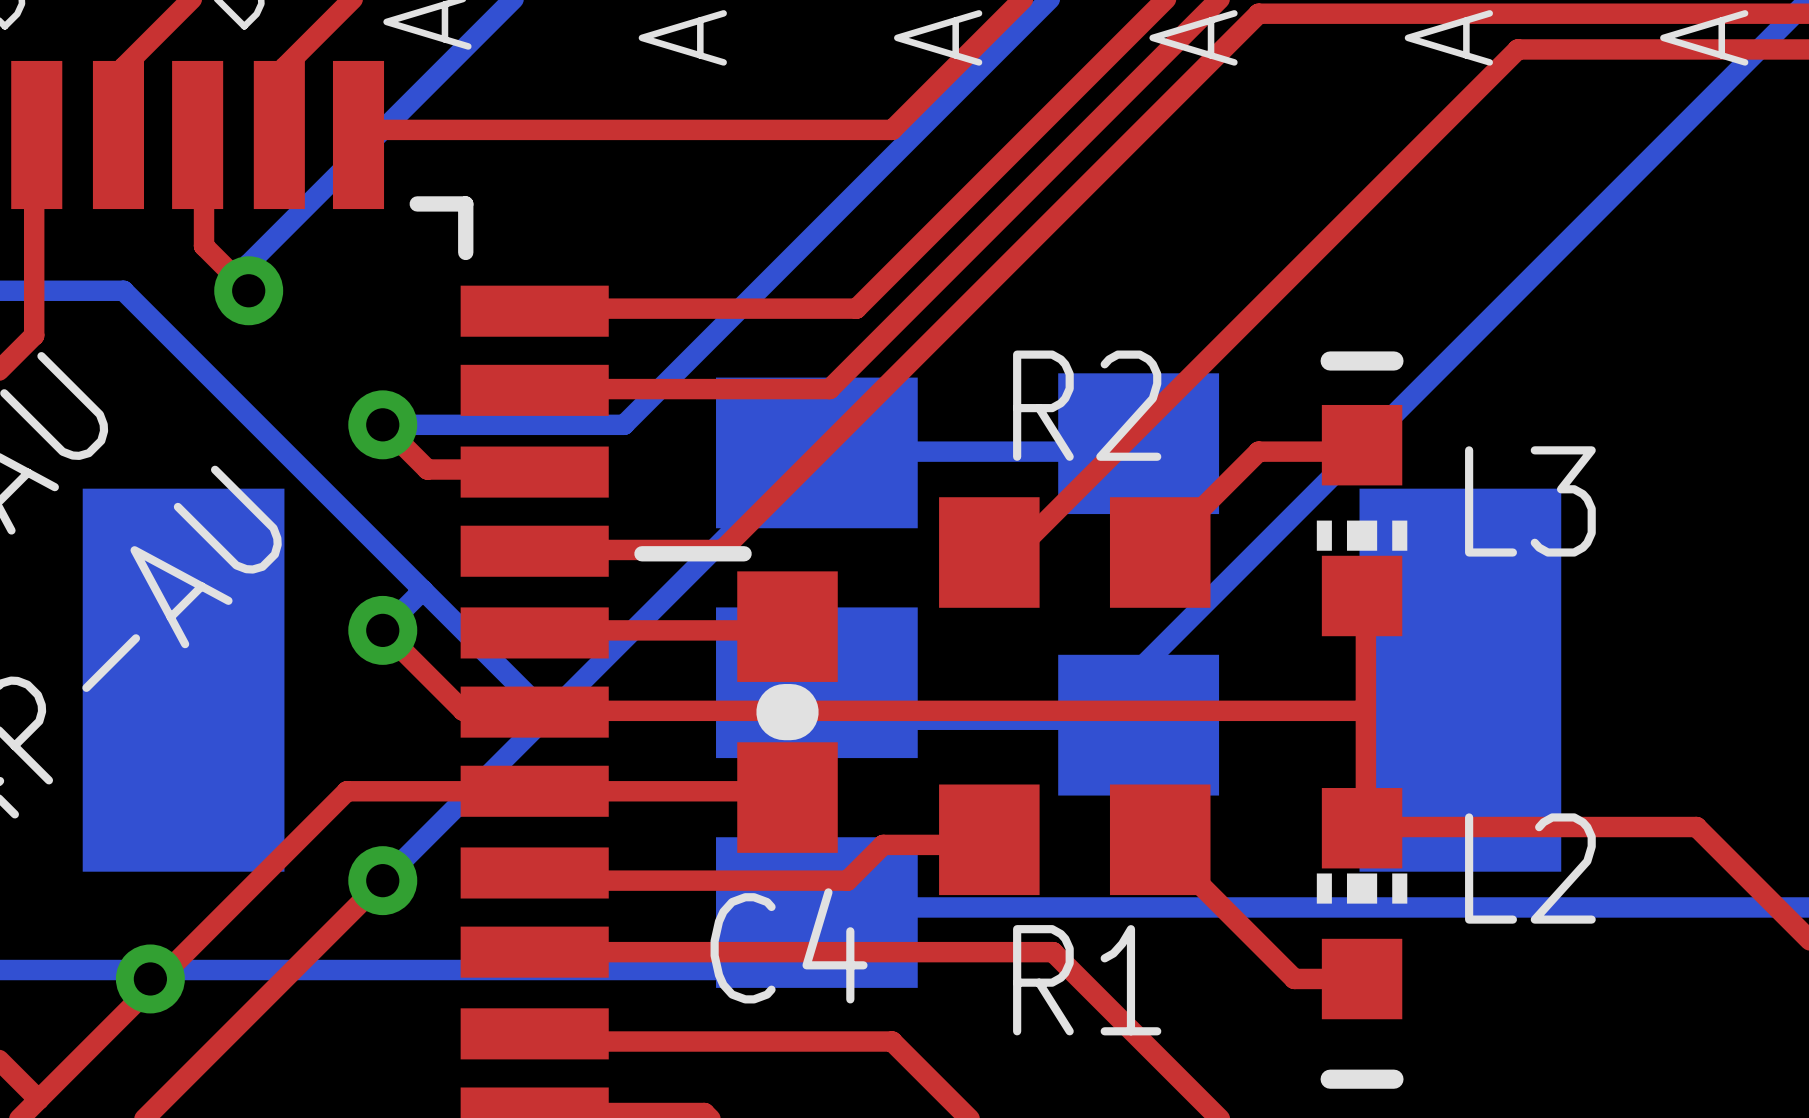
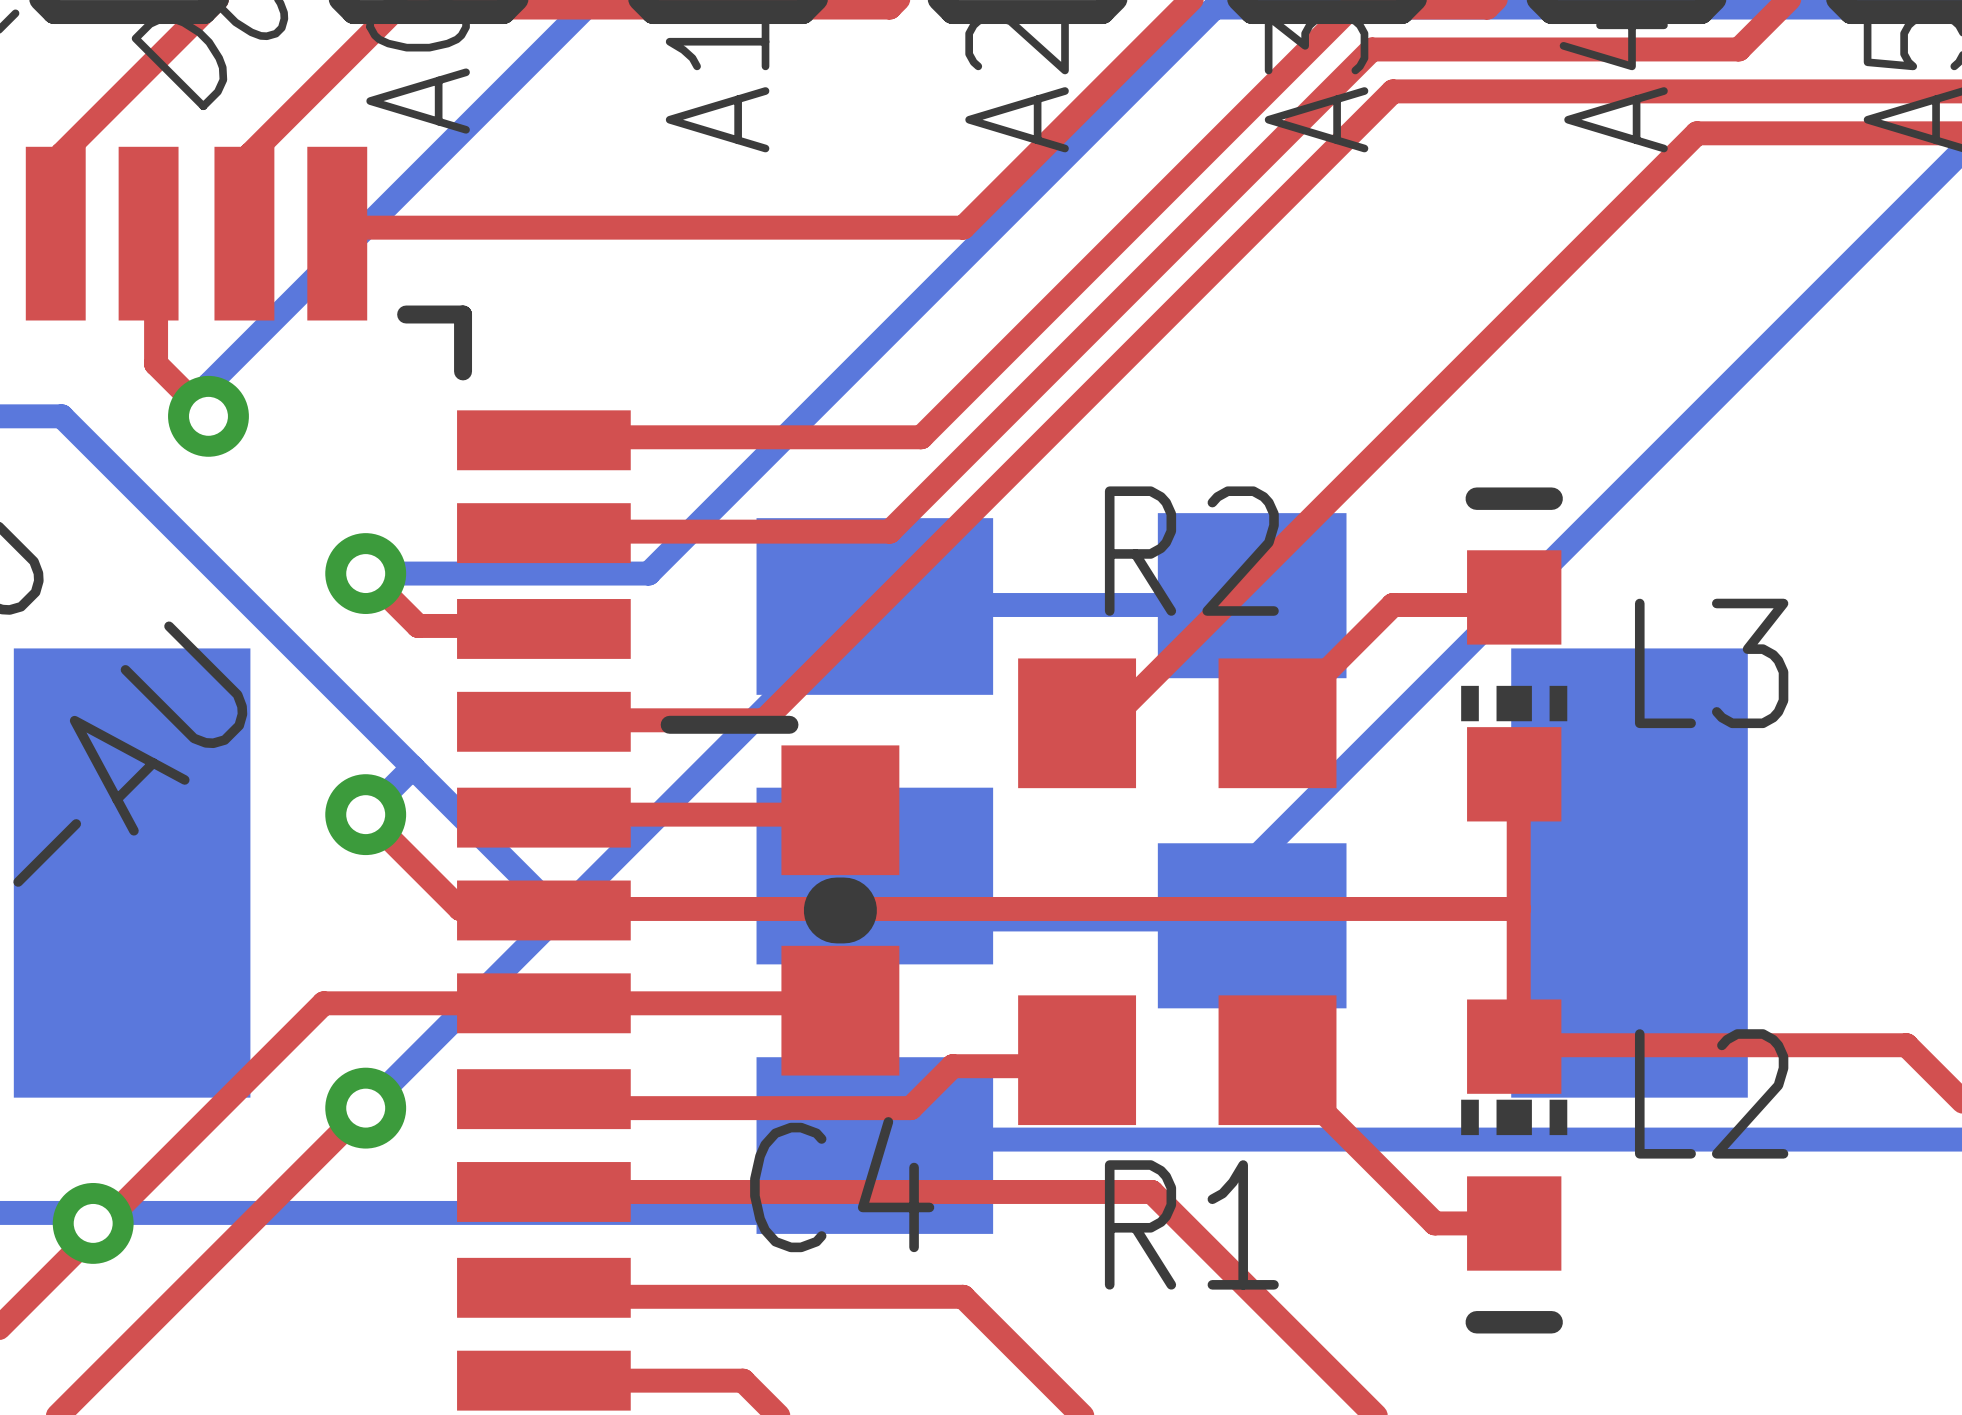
line: (1330, 1079) (1393, 1079) -> (1476, 1322) (1551, 1322)

